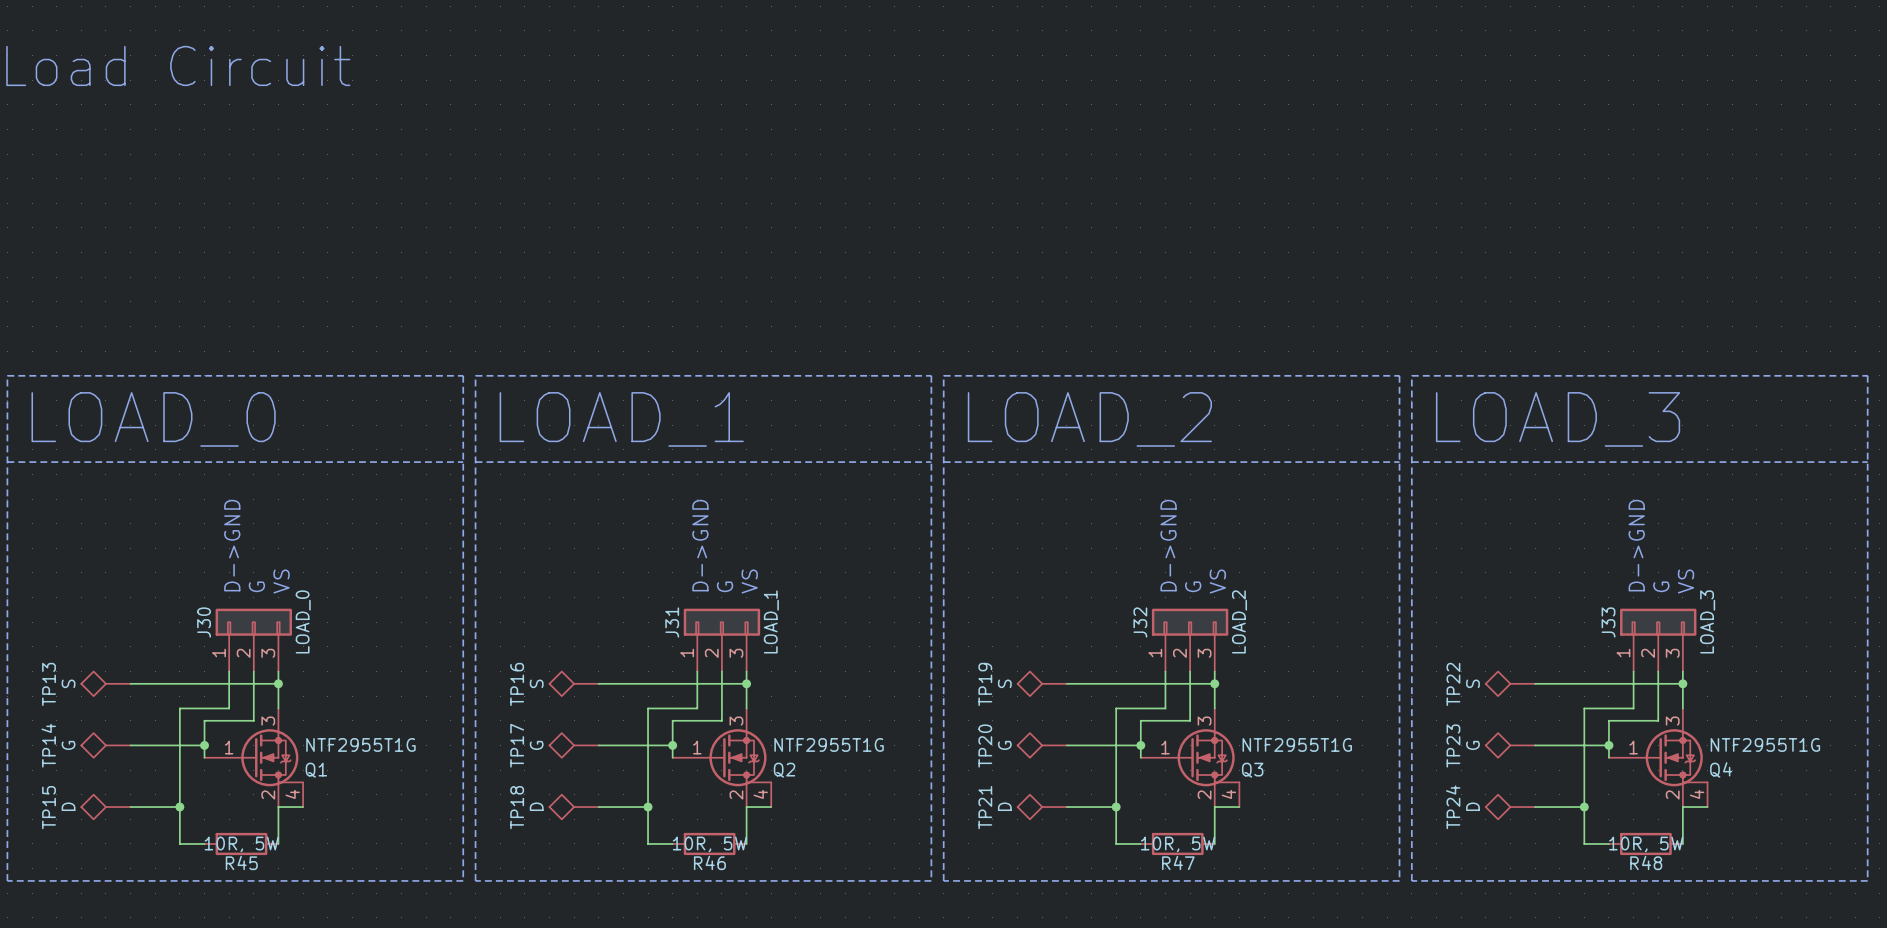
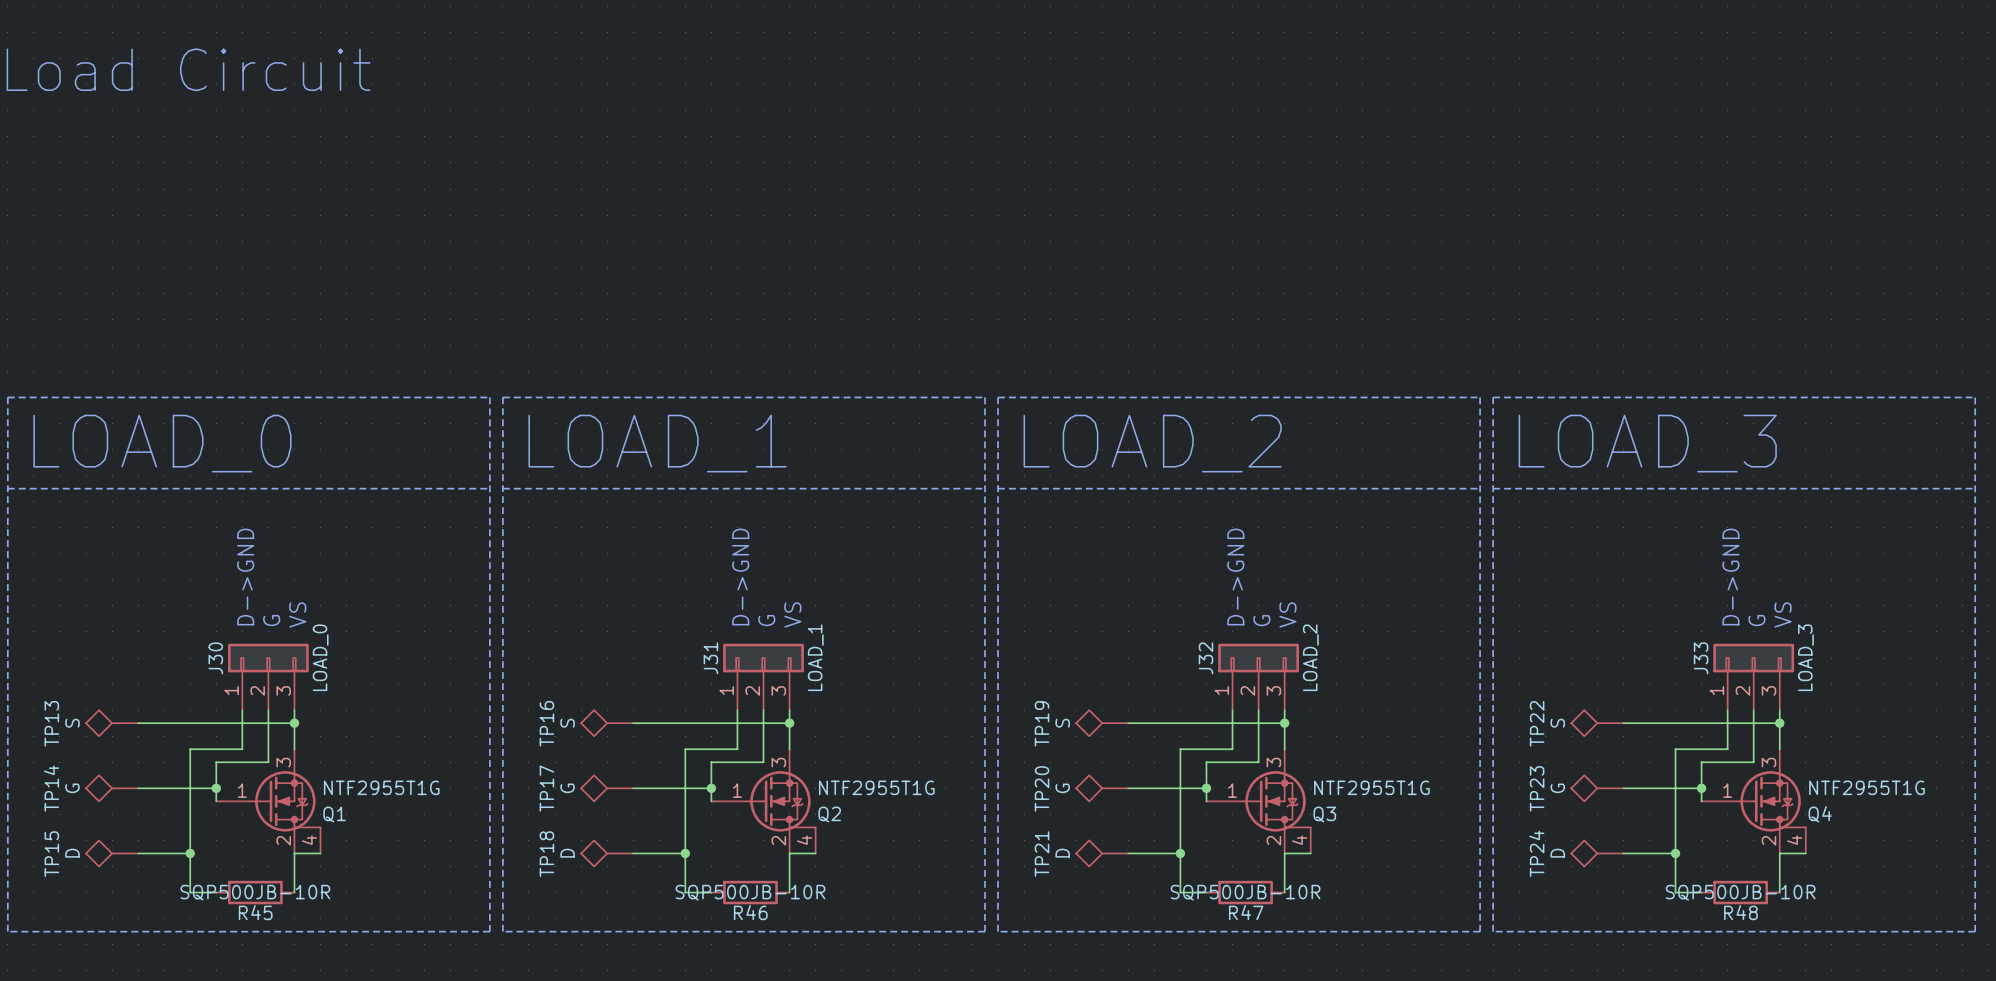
R45 value: 10R, 5W (241, 844) -> SQP500JB-10R (255, 892)
R46 value: 10R, 5W (709, 844) -> SQP500JB-10R (750, 892)
R47 value: 10R, 5W (1178, 844) -> SQP500JB-10R (1245, 892)
R48 value: 10R, 5W (1646, 844) -> SQP500JB-10R (1740, 892)

